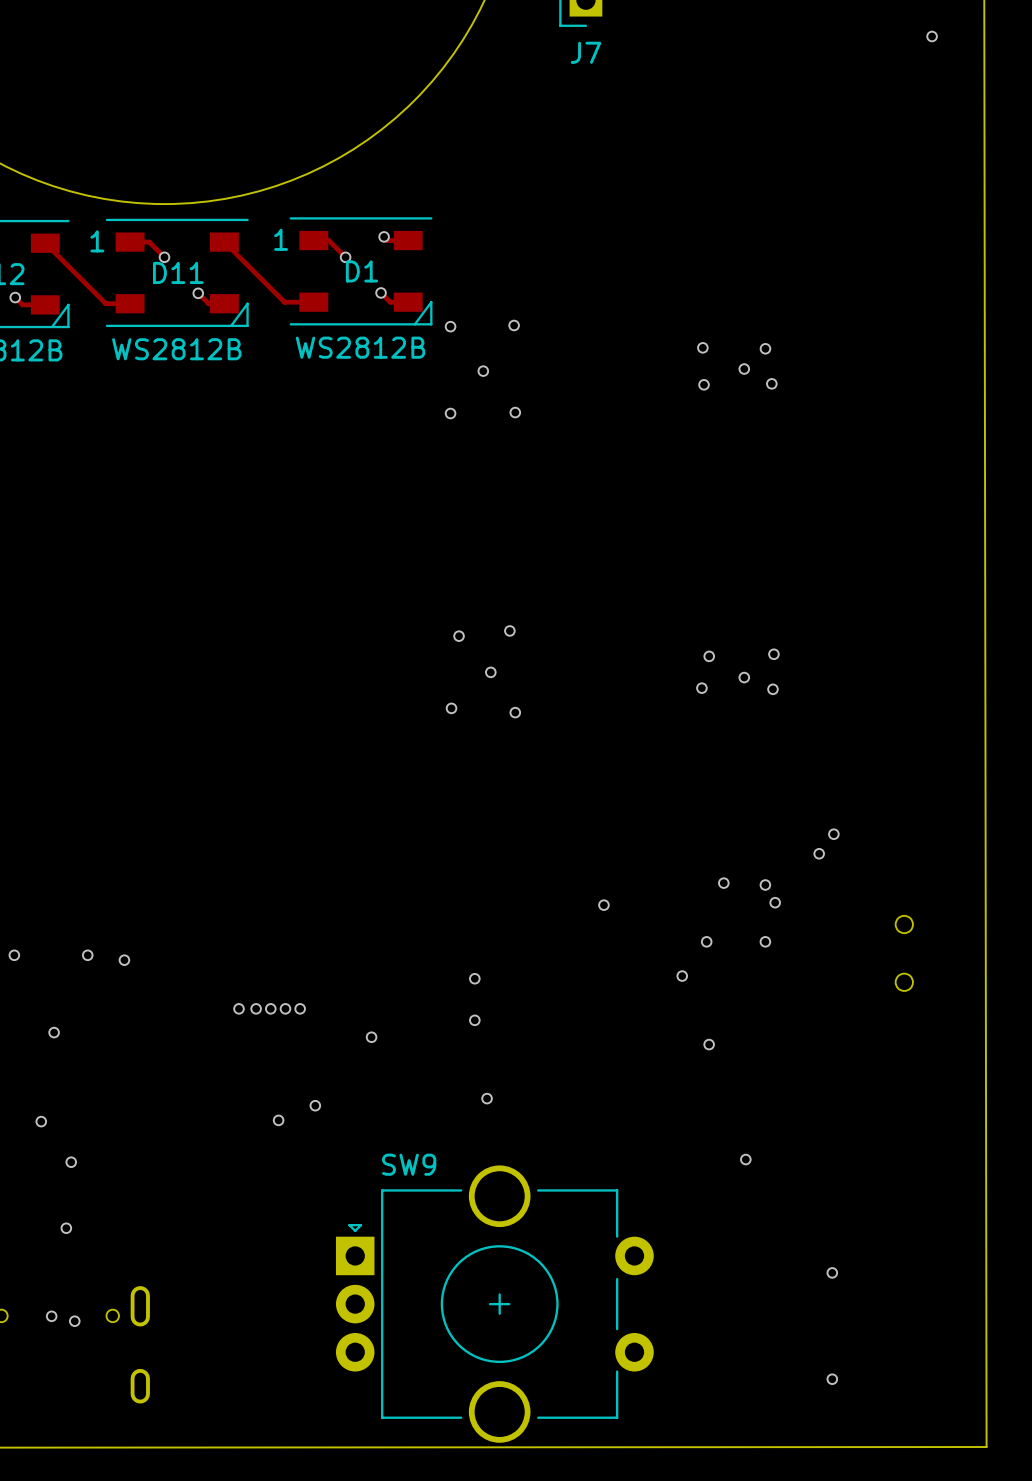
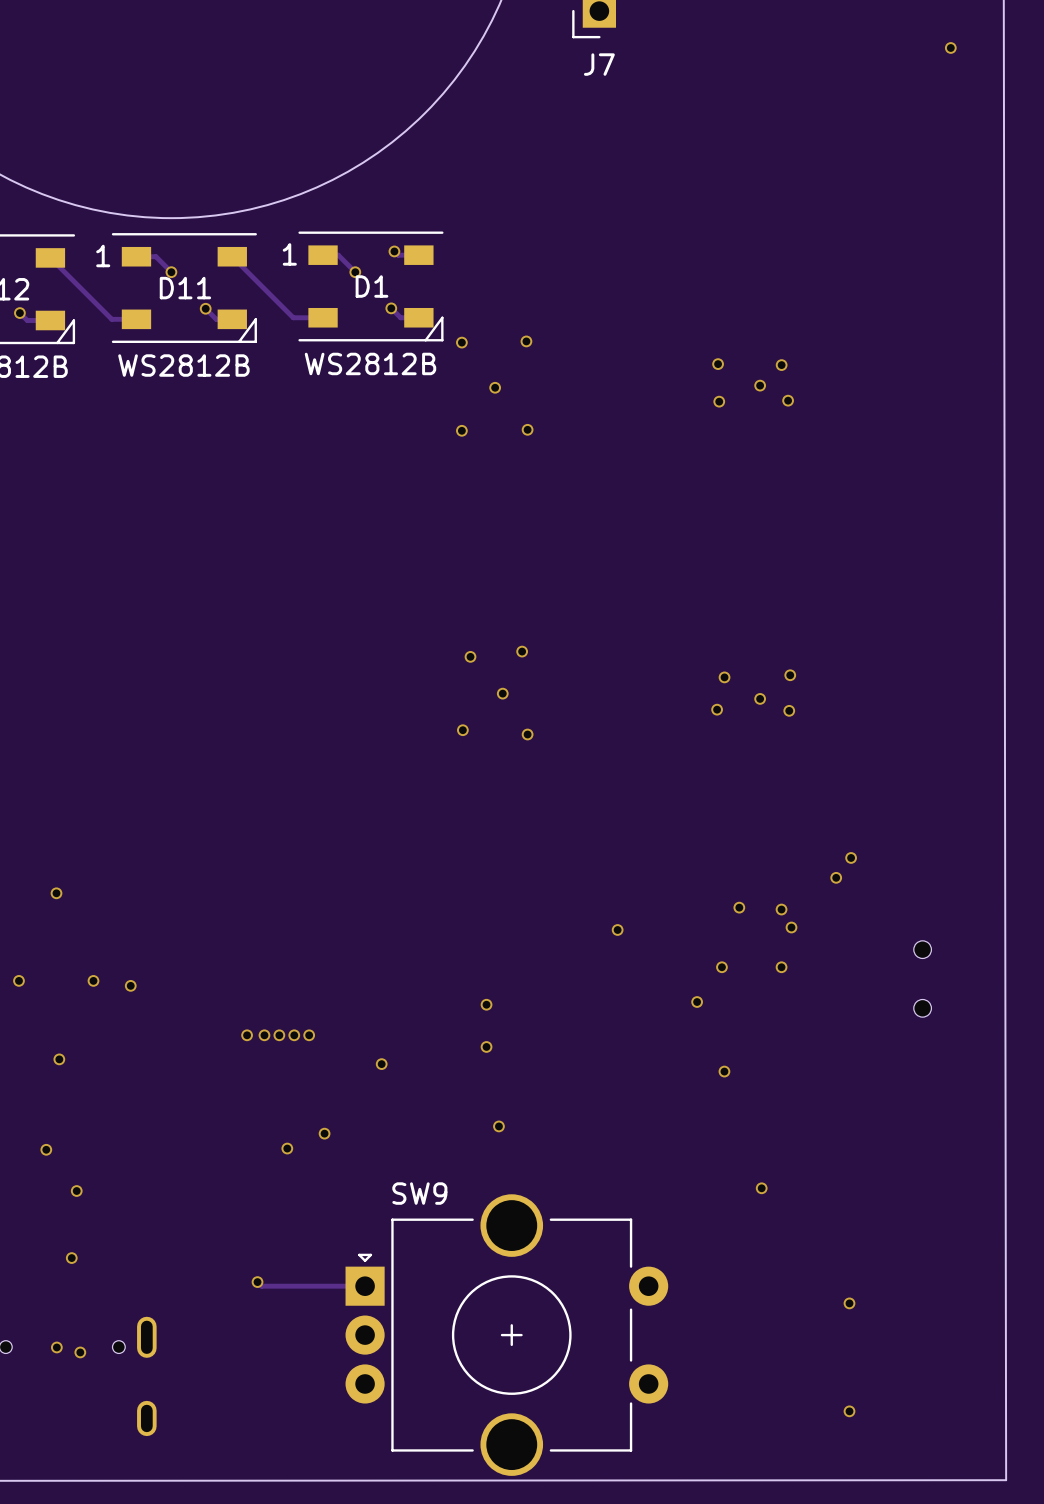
via: none -> (56, 893)
track: none -> (257, 1282) (261, 1286) (365, 1286)
via: none -> (257, 1282)

